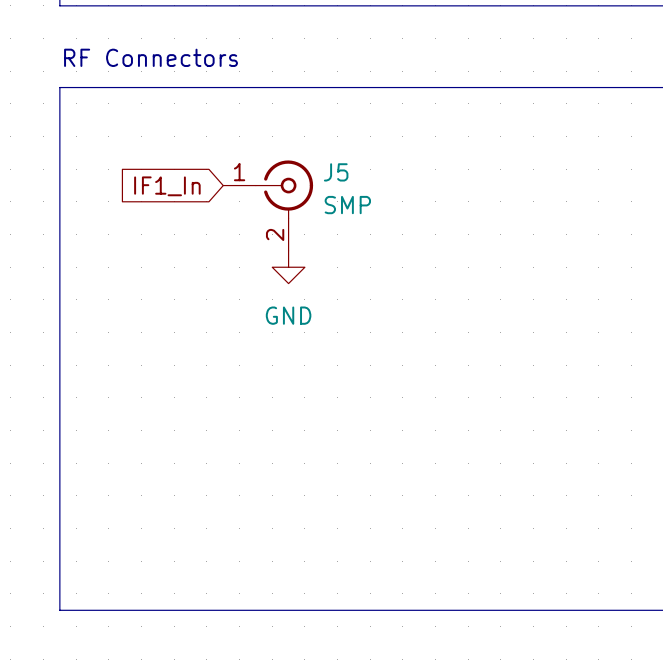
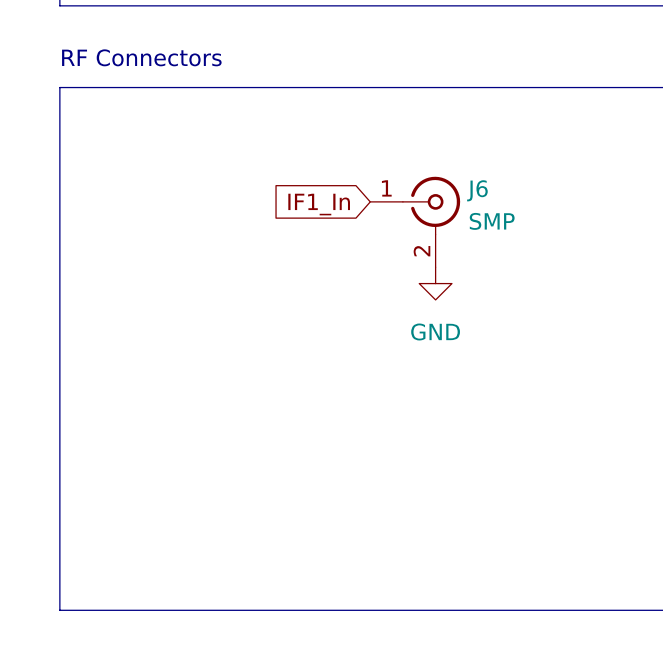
global label position: IF1_In (167, 186) -> IF1_In (319, 204)
J5: SMP (268, 205) -> none
J6: none -> SMP (415, 222)
power symbol position: GND (288, 267) -> GND (435, 283)

